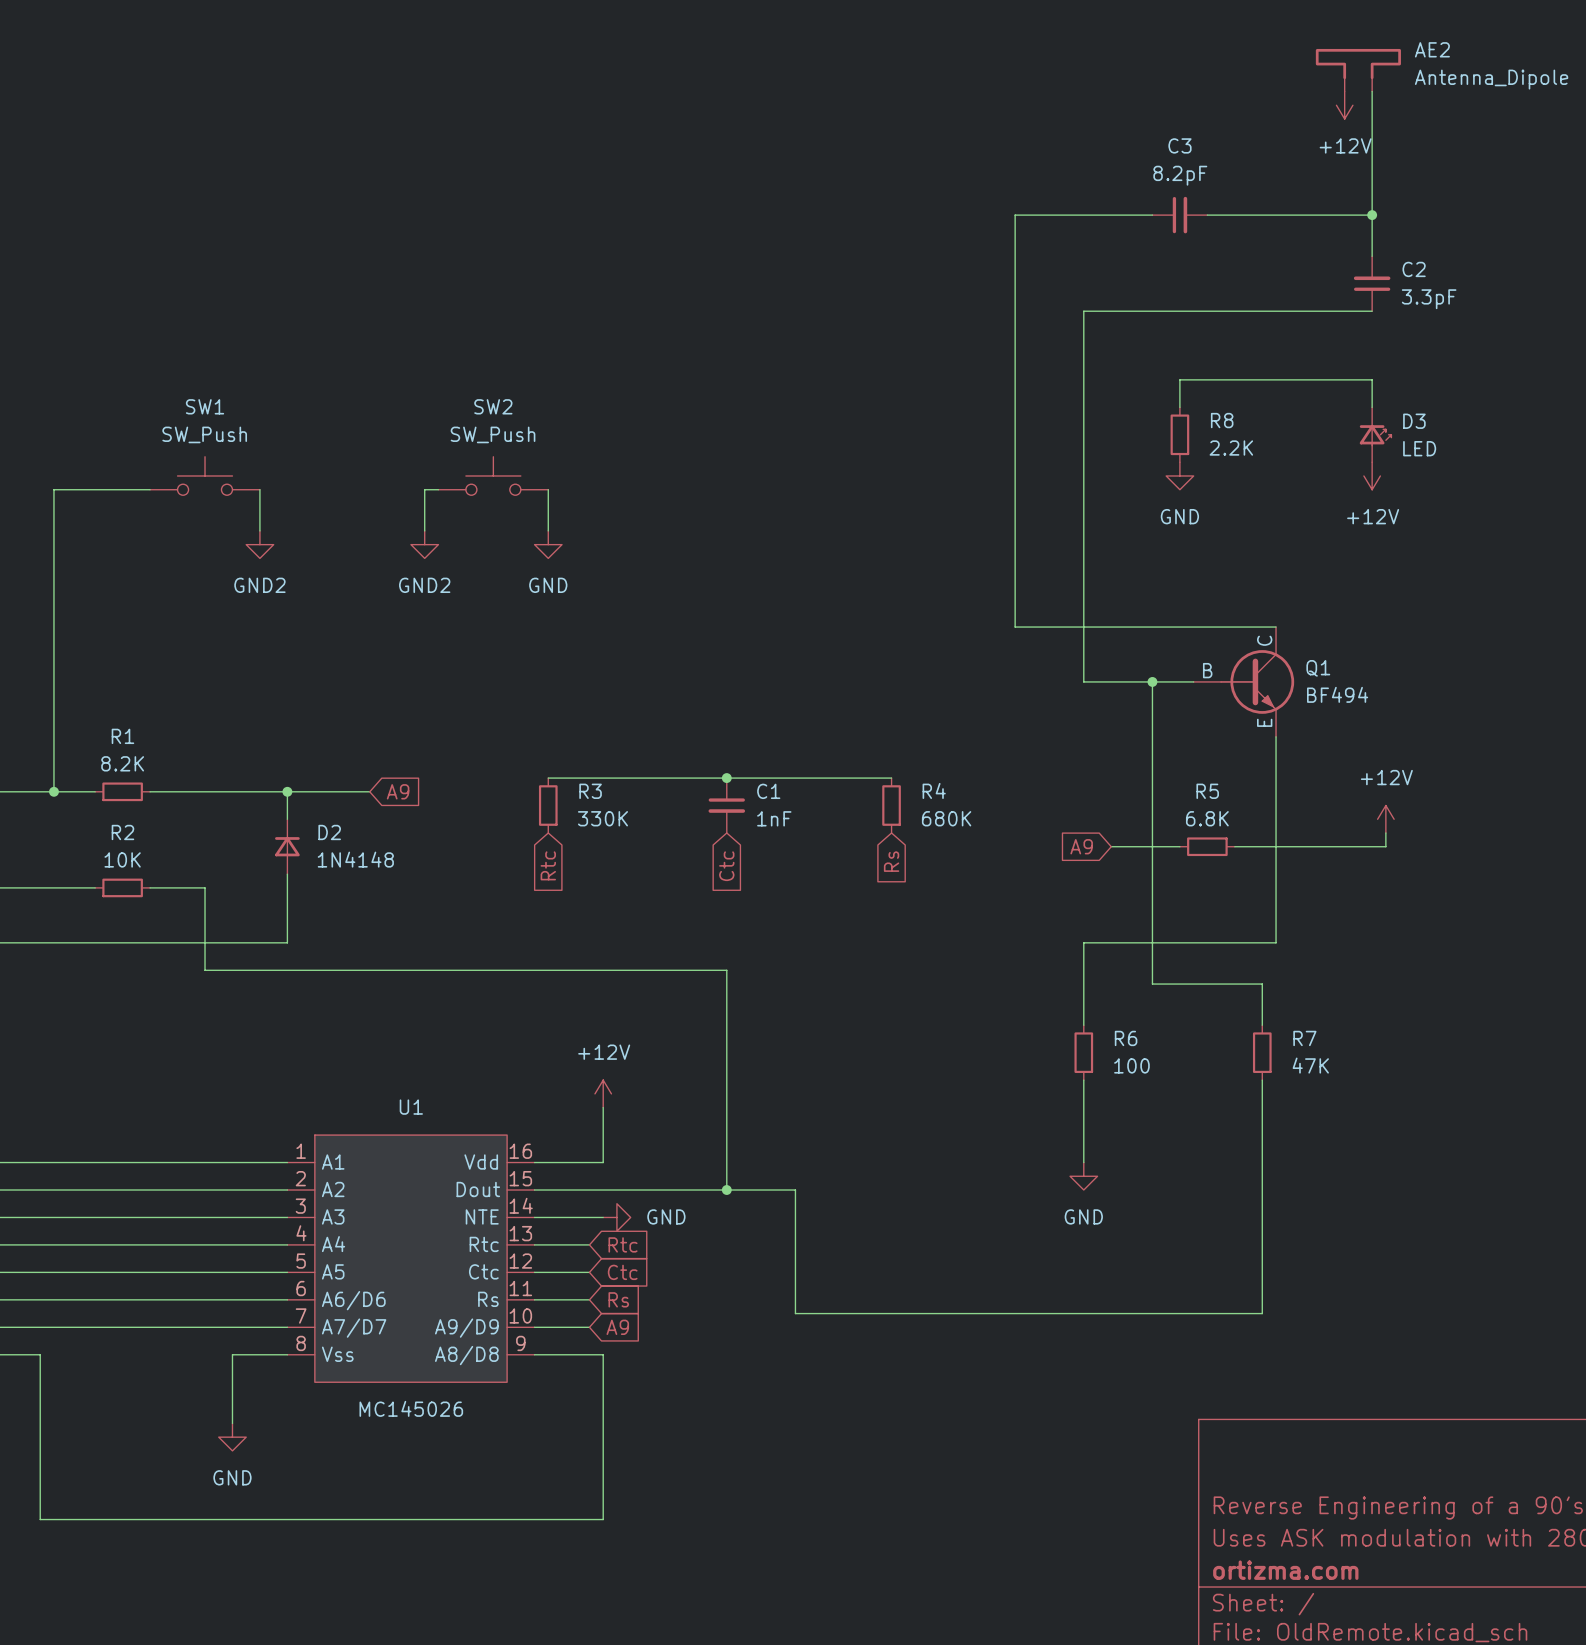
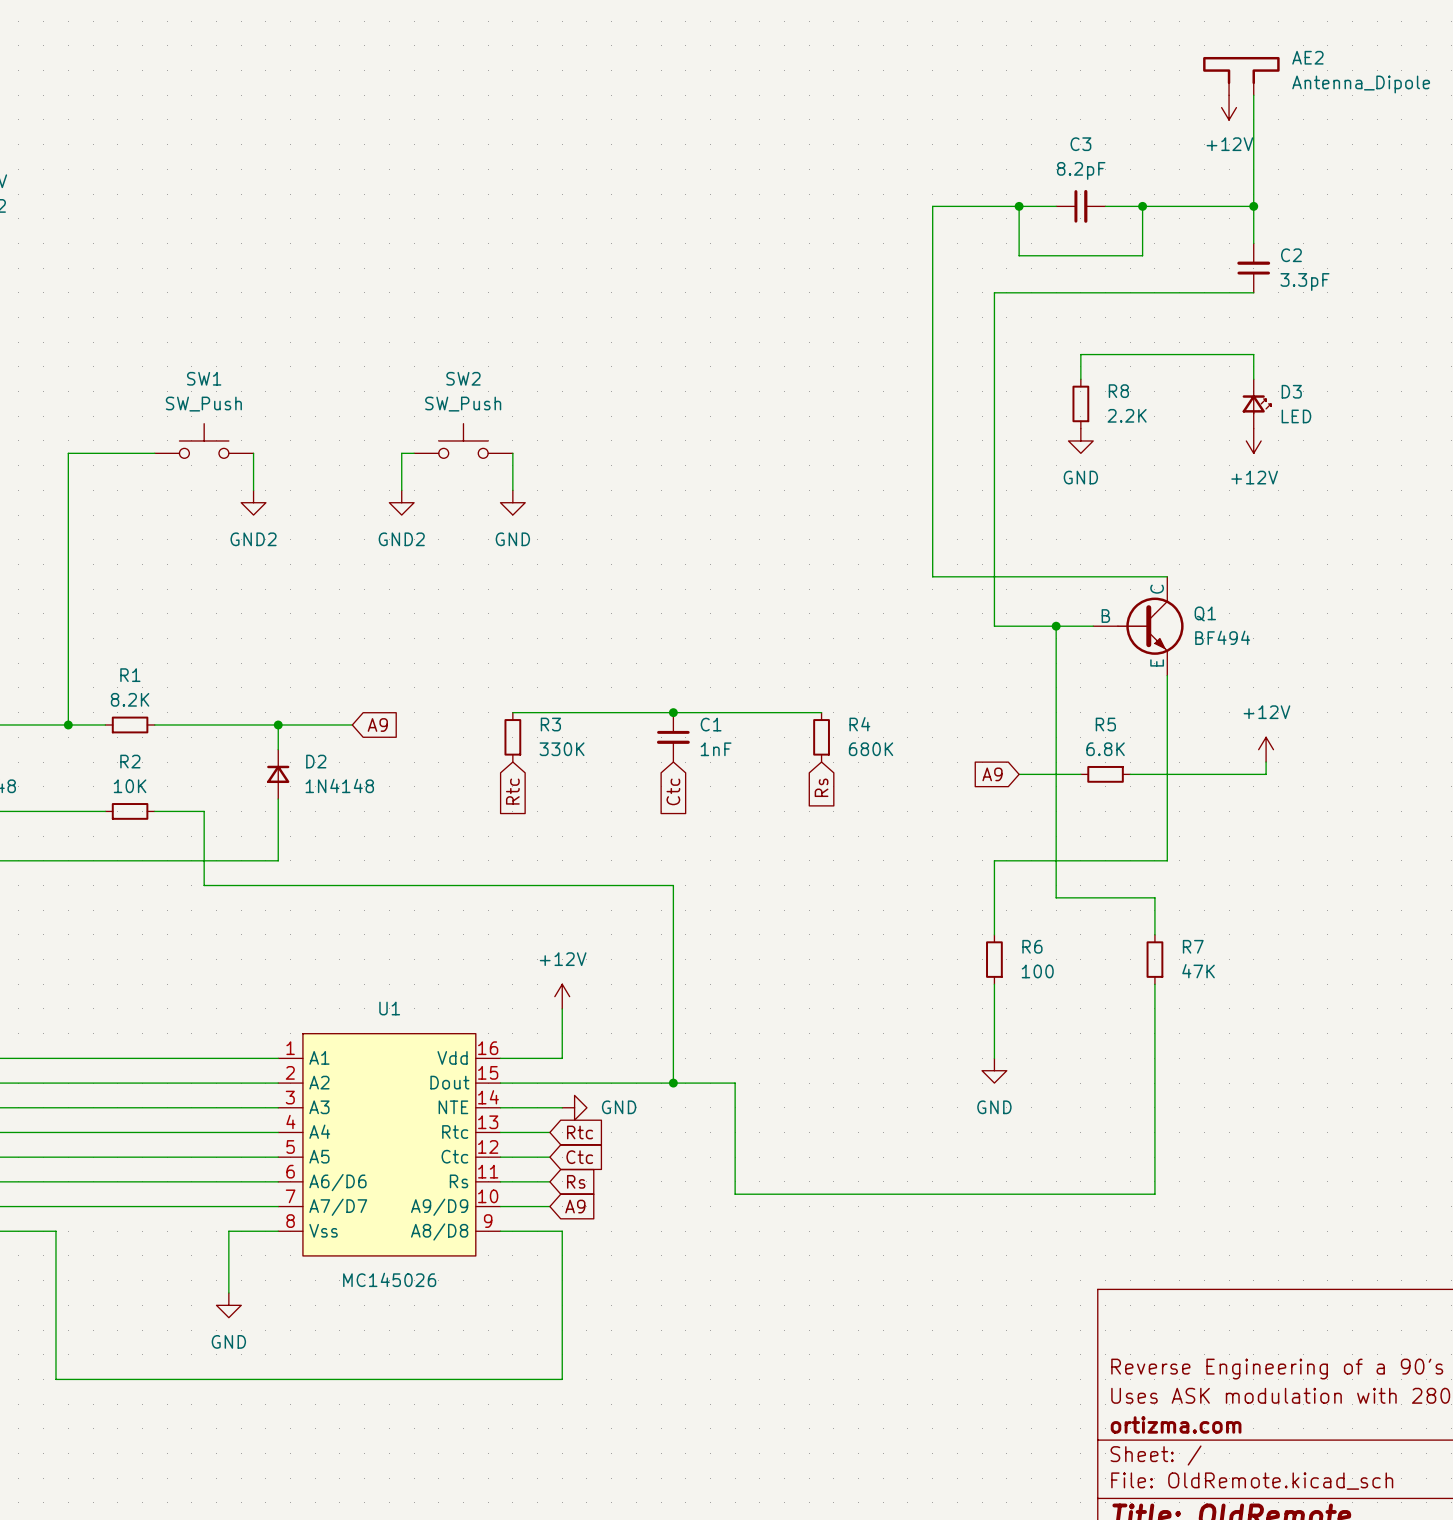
wire: none -> (1019, 206) (1019, 255) (1142, 255) (1142, 206)
junction: none -> (1019, 206)
junction: none -> (1142, 206)

